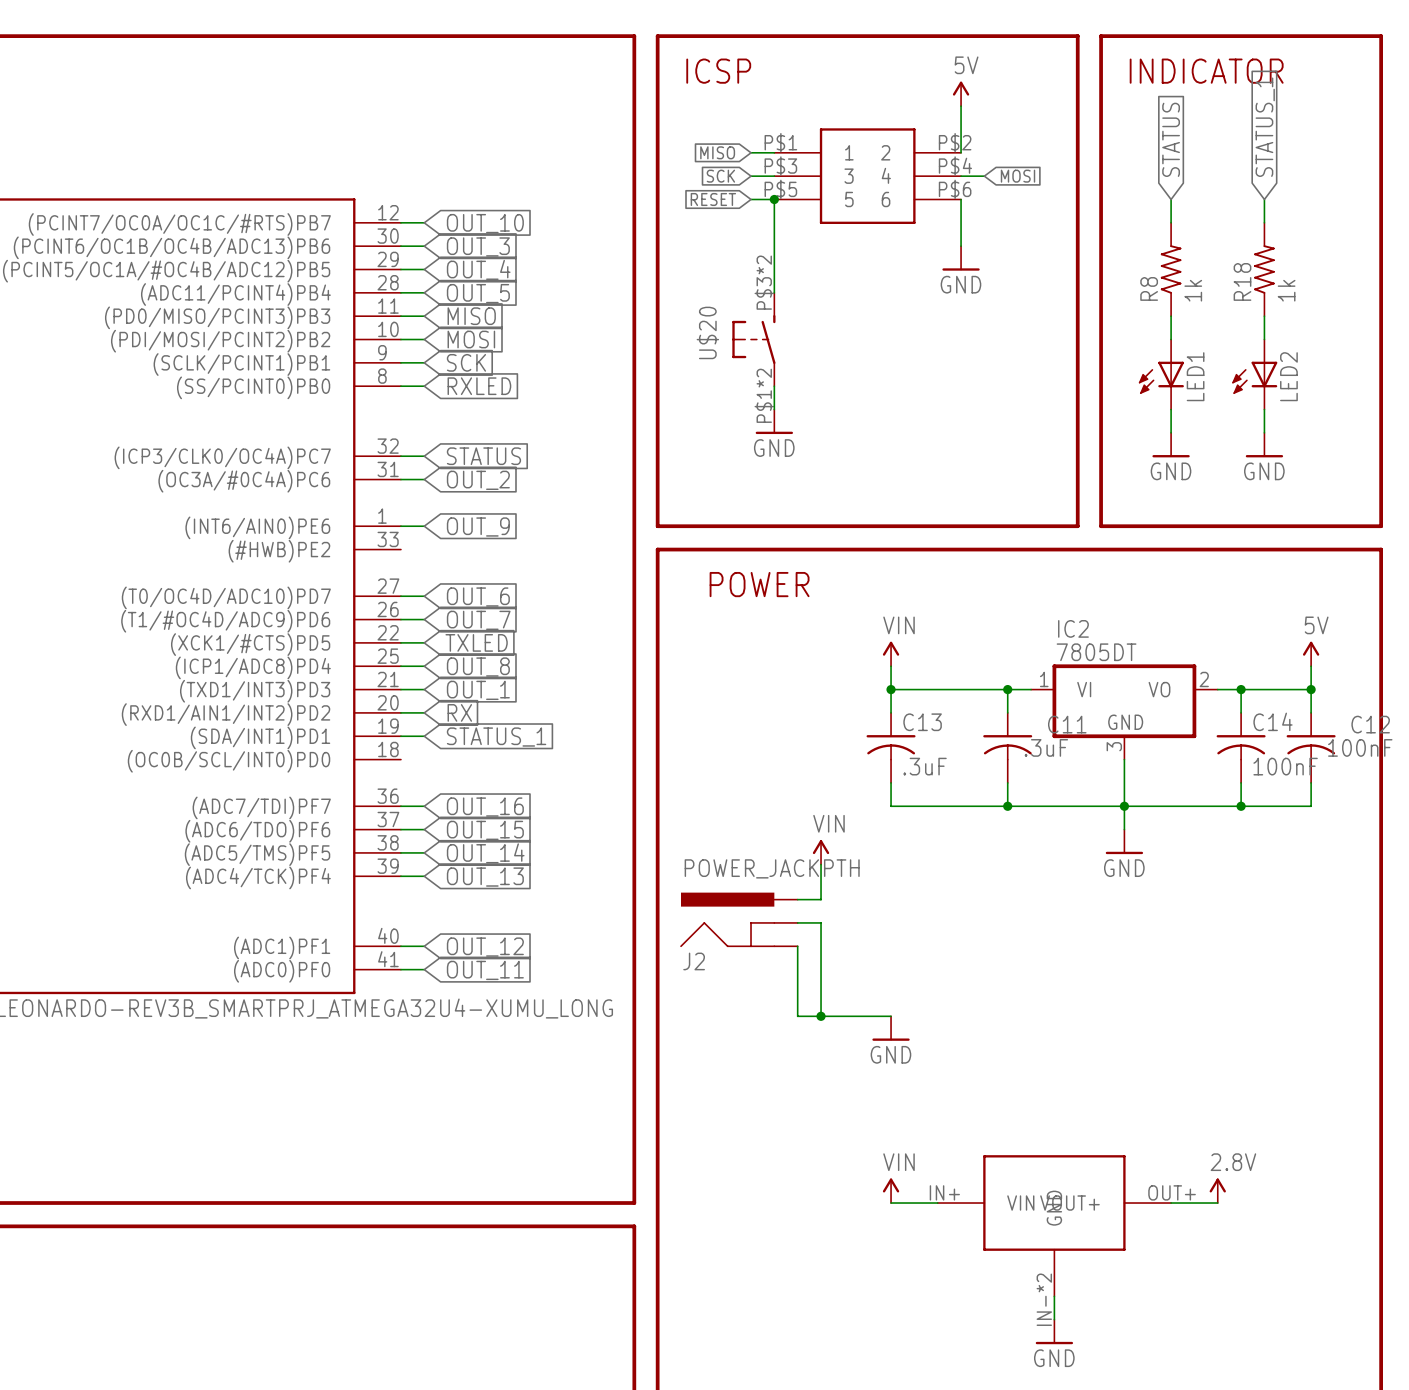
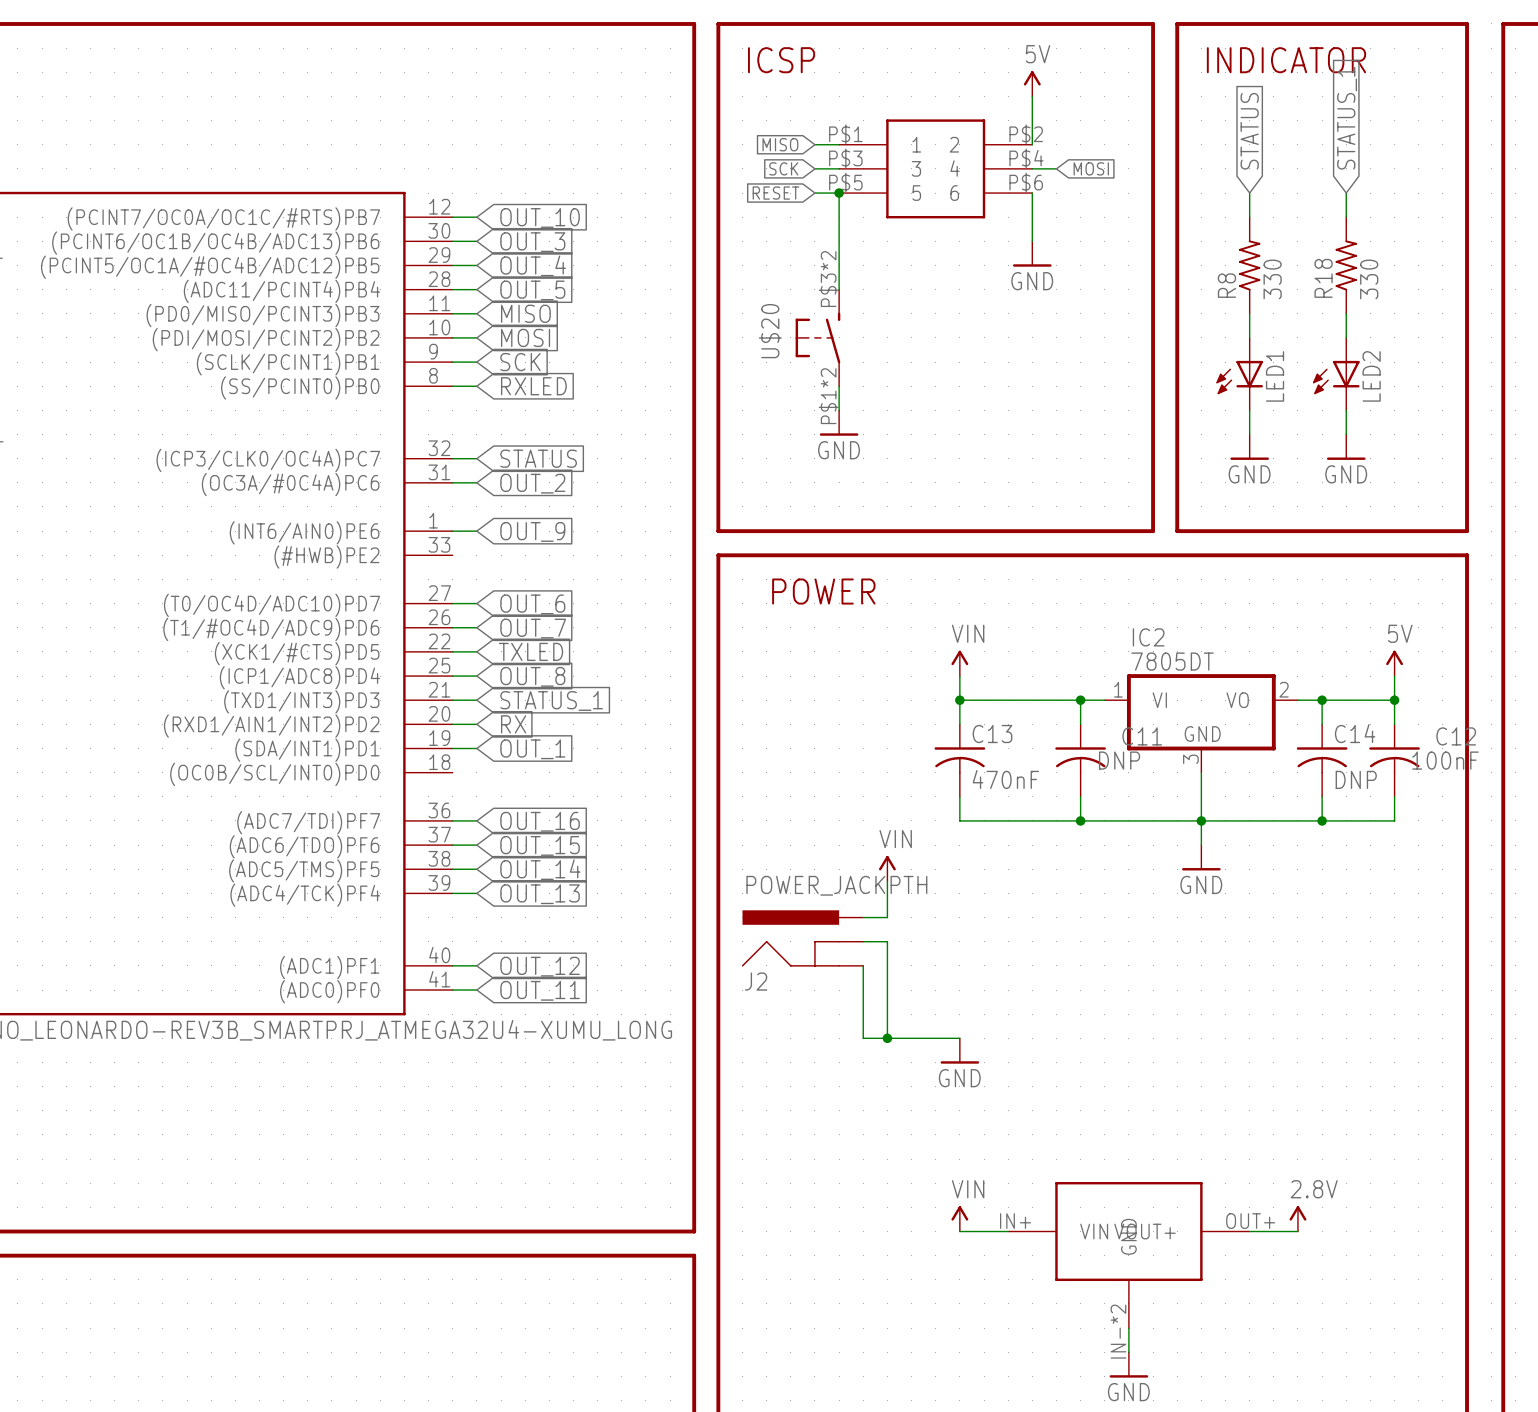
R8 value: 1k (1193, 290) -> 330 (1272, 279)
R18 value: 1k (1286, 290) -> 330 (1369, 279)
global label: OUT_1 (478, 690) -> STATUS_1 (551, 701)
global label: STATUS_1 (496, 737) -> OUT_1 (532, 749)
C11 value: .3uF (1046, 747) -> DNP (1119, 760)
C13 value: .3uF (925, 766) -> 470nF (1005, 779)
C14 value: 100nF (1285, 766) -> DNP (1356, 779)

